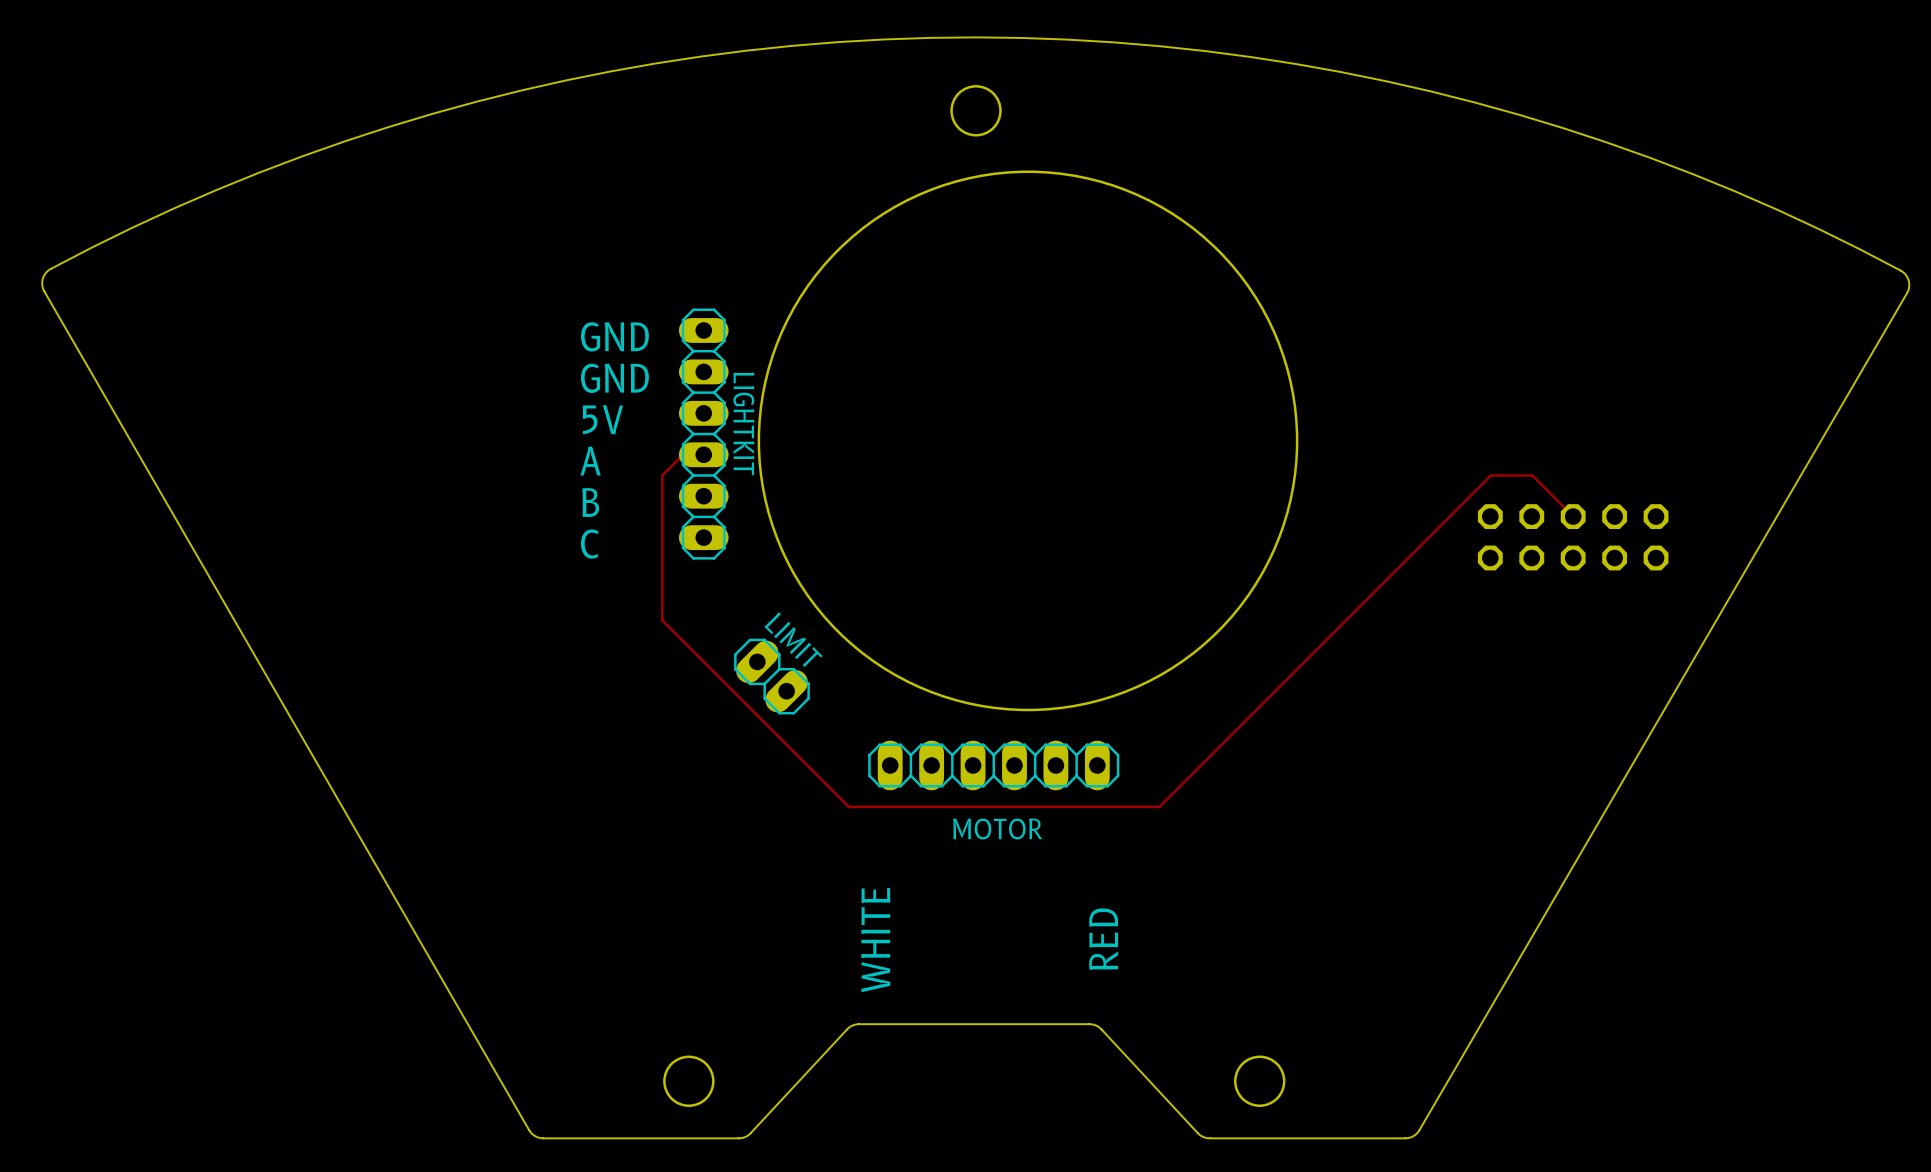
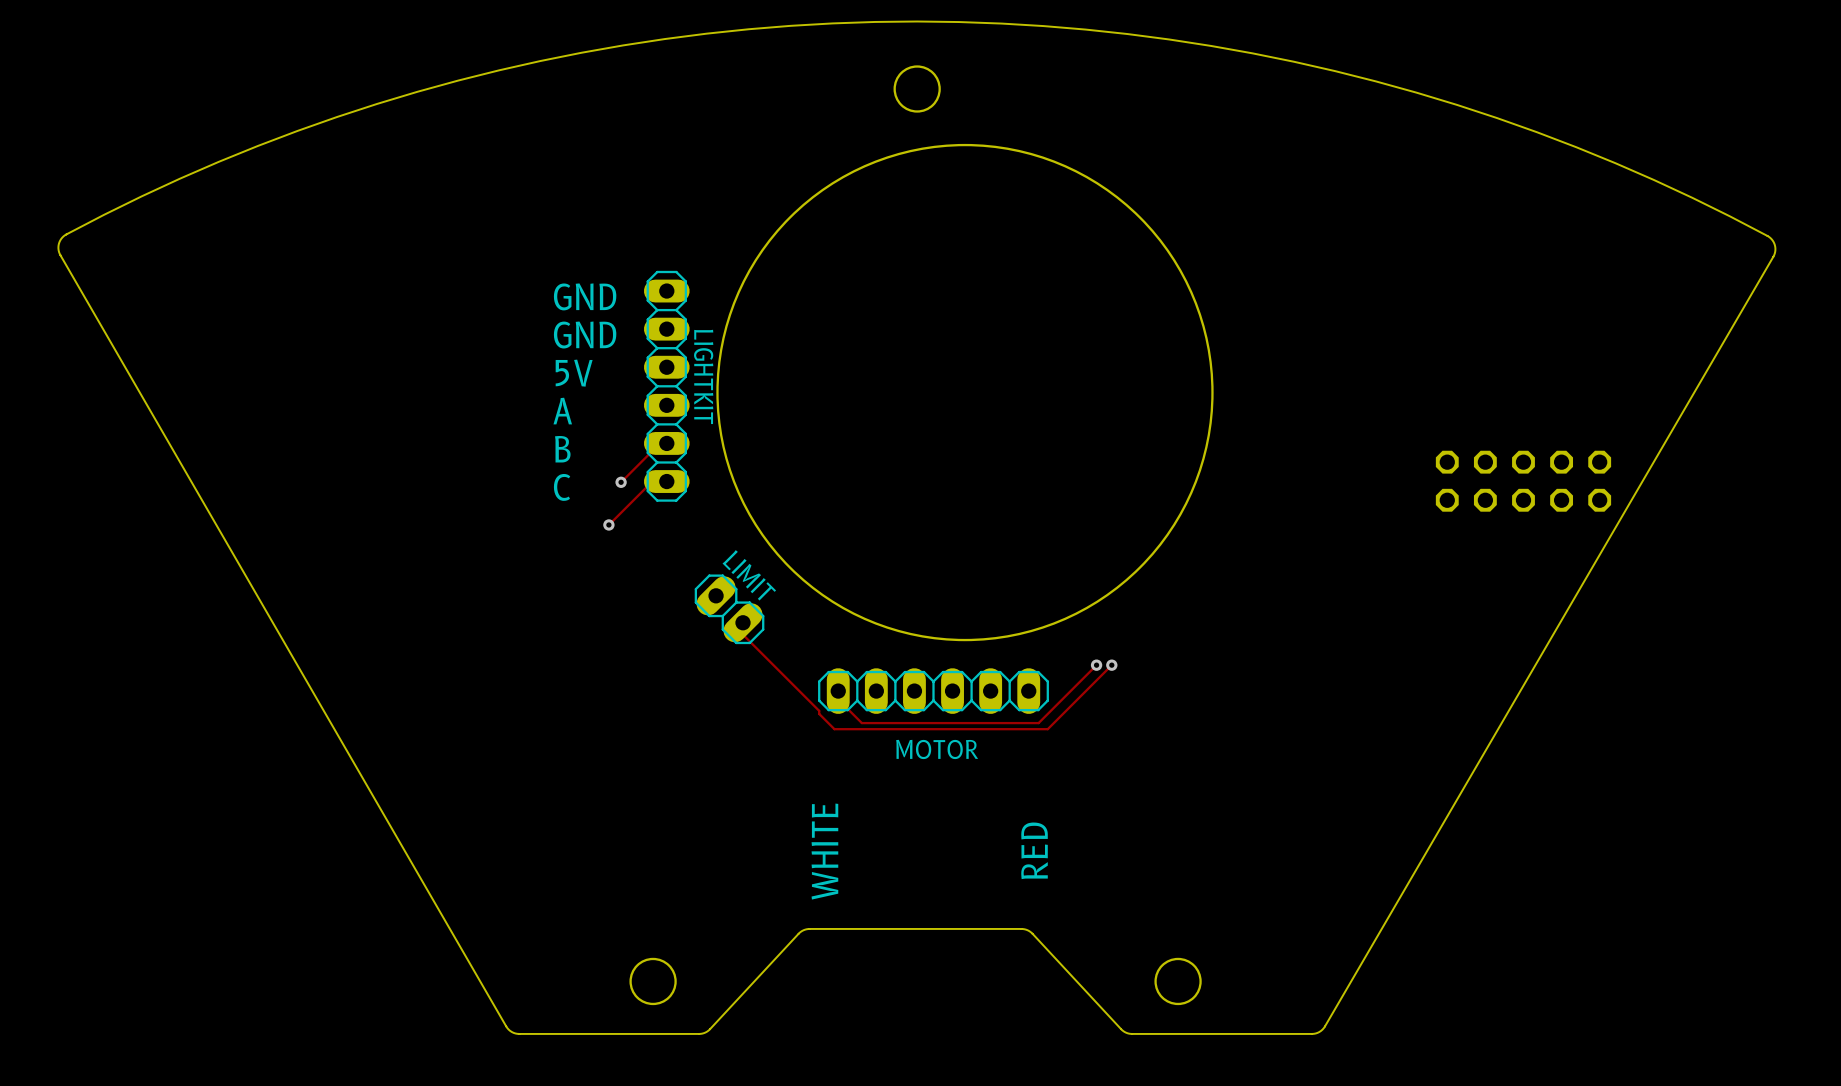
track: (703, 454) (683, 454) (662, 475) (662, 620) (848, 806) (886, 806) -> (743, 622) (743, 634) (819, 710) (819, 713) (834, 729)
track: none -> (666, 443) (666, 445) (657, 445) (621, 482)
track: (1573, 516) (1532, 475) (1490, 475) (1159, 806) (1118, 806) -> (1111, 665) (1047, 729)
track: none -> (666, 481) (651, 482) (608, 524)
part position: (1573, 537) -> (1523, 481)
via: none -> (621, 482)
via: none -> (608, 524)
track: none -> (1096, 665) (1038, 723) (861, 723) (840, 701) (840, 692) (838, 691)
via: none -> (1096, 665)
via: none -> (1111, 665)

